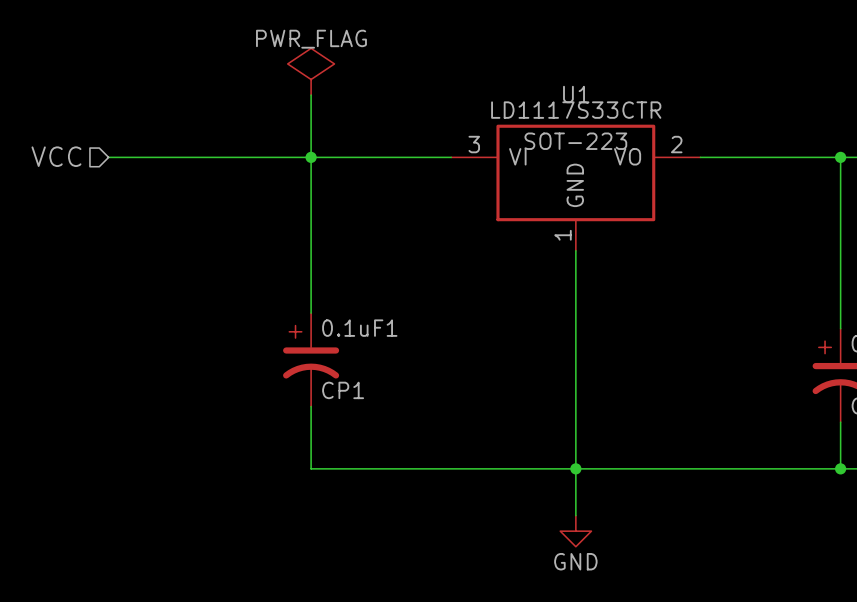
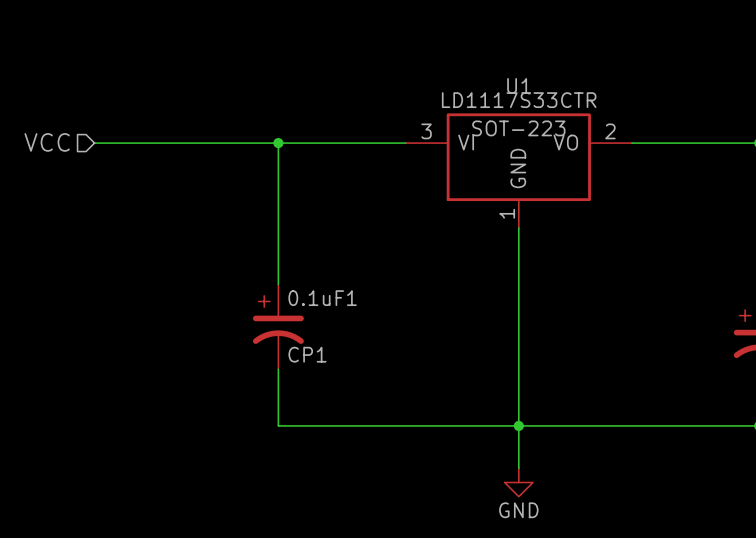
power symbol: PWR_FLAG (311, 71) -> none
wire: (311, 95) (311, 157) -> none

